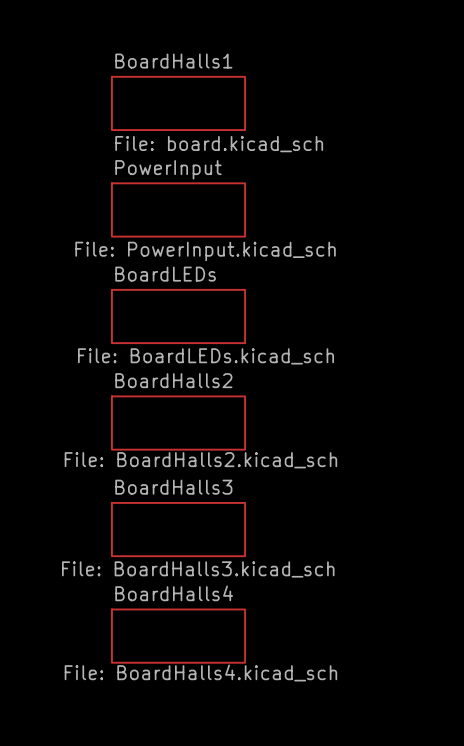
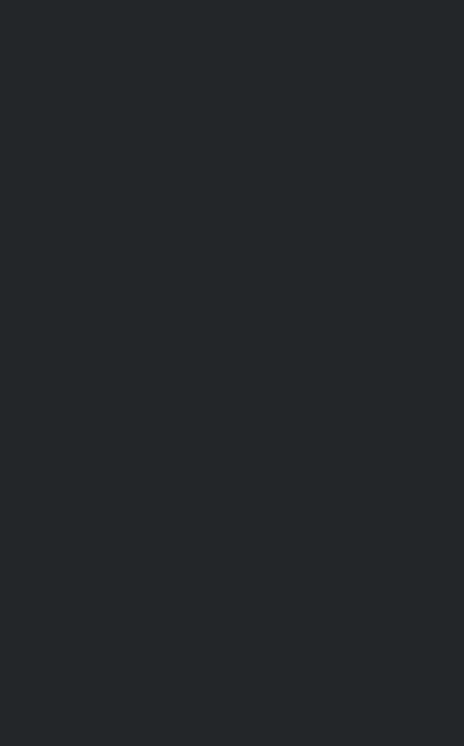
sheet BoardHalls1: File: board.kicad_sch (178, 103) -> none
sheet PowerInput: File: PowerInput.kicad_sch (178, 209) -> none
sheet BoardLEDs: File: BoardLEDs.kicad_sch (178, 316) -> none
sheet BoardHalls2: File: BoardHalls2.kicad_sch (178, 423) -> none
sheet BoardHalls3: File: BoardHalls3.kicad_sch (178, 529) -> none
sheet BoardHalls4: File: BoardHalls4.kicad_sch (178, 636) -> none

